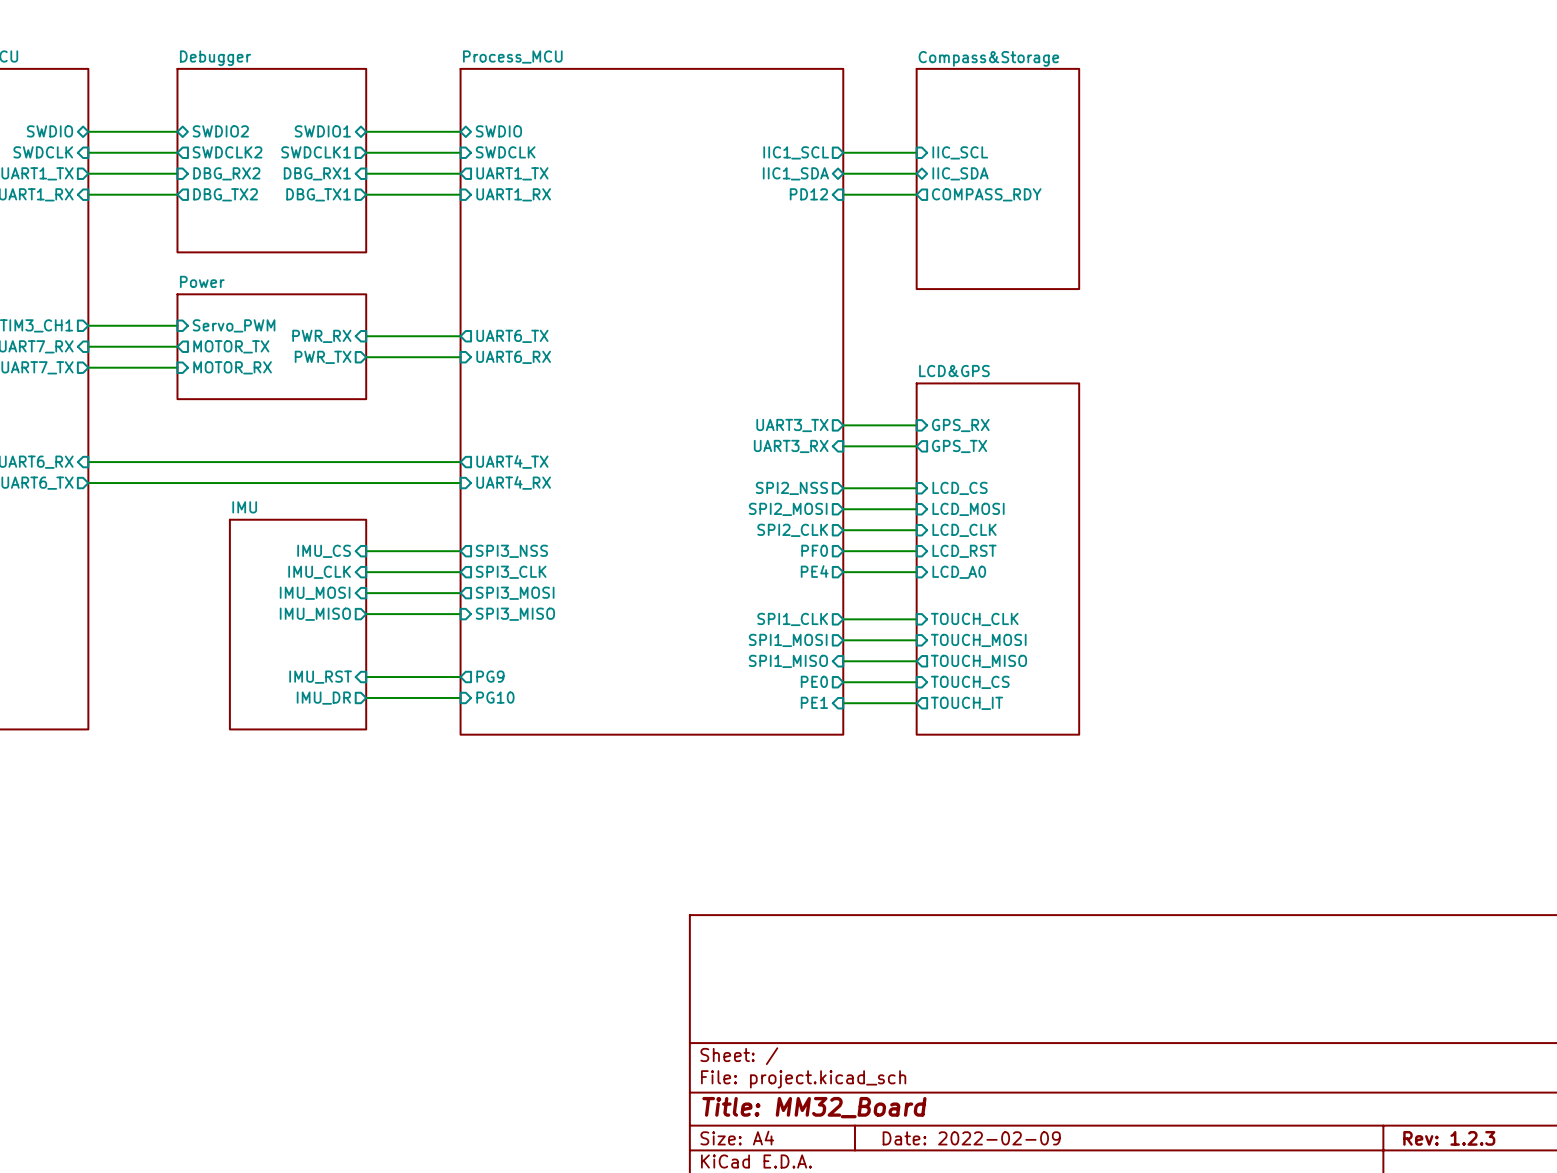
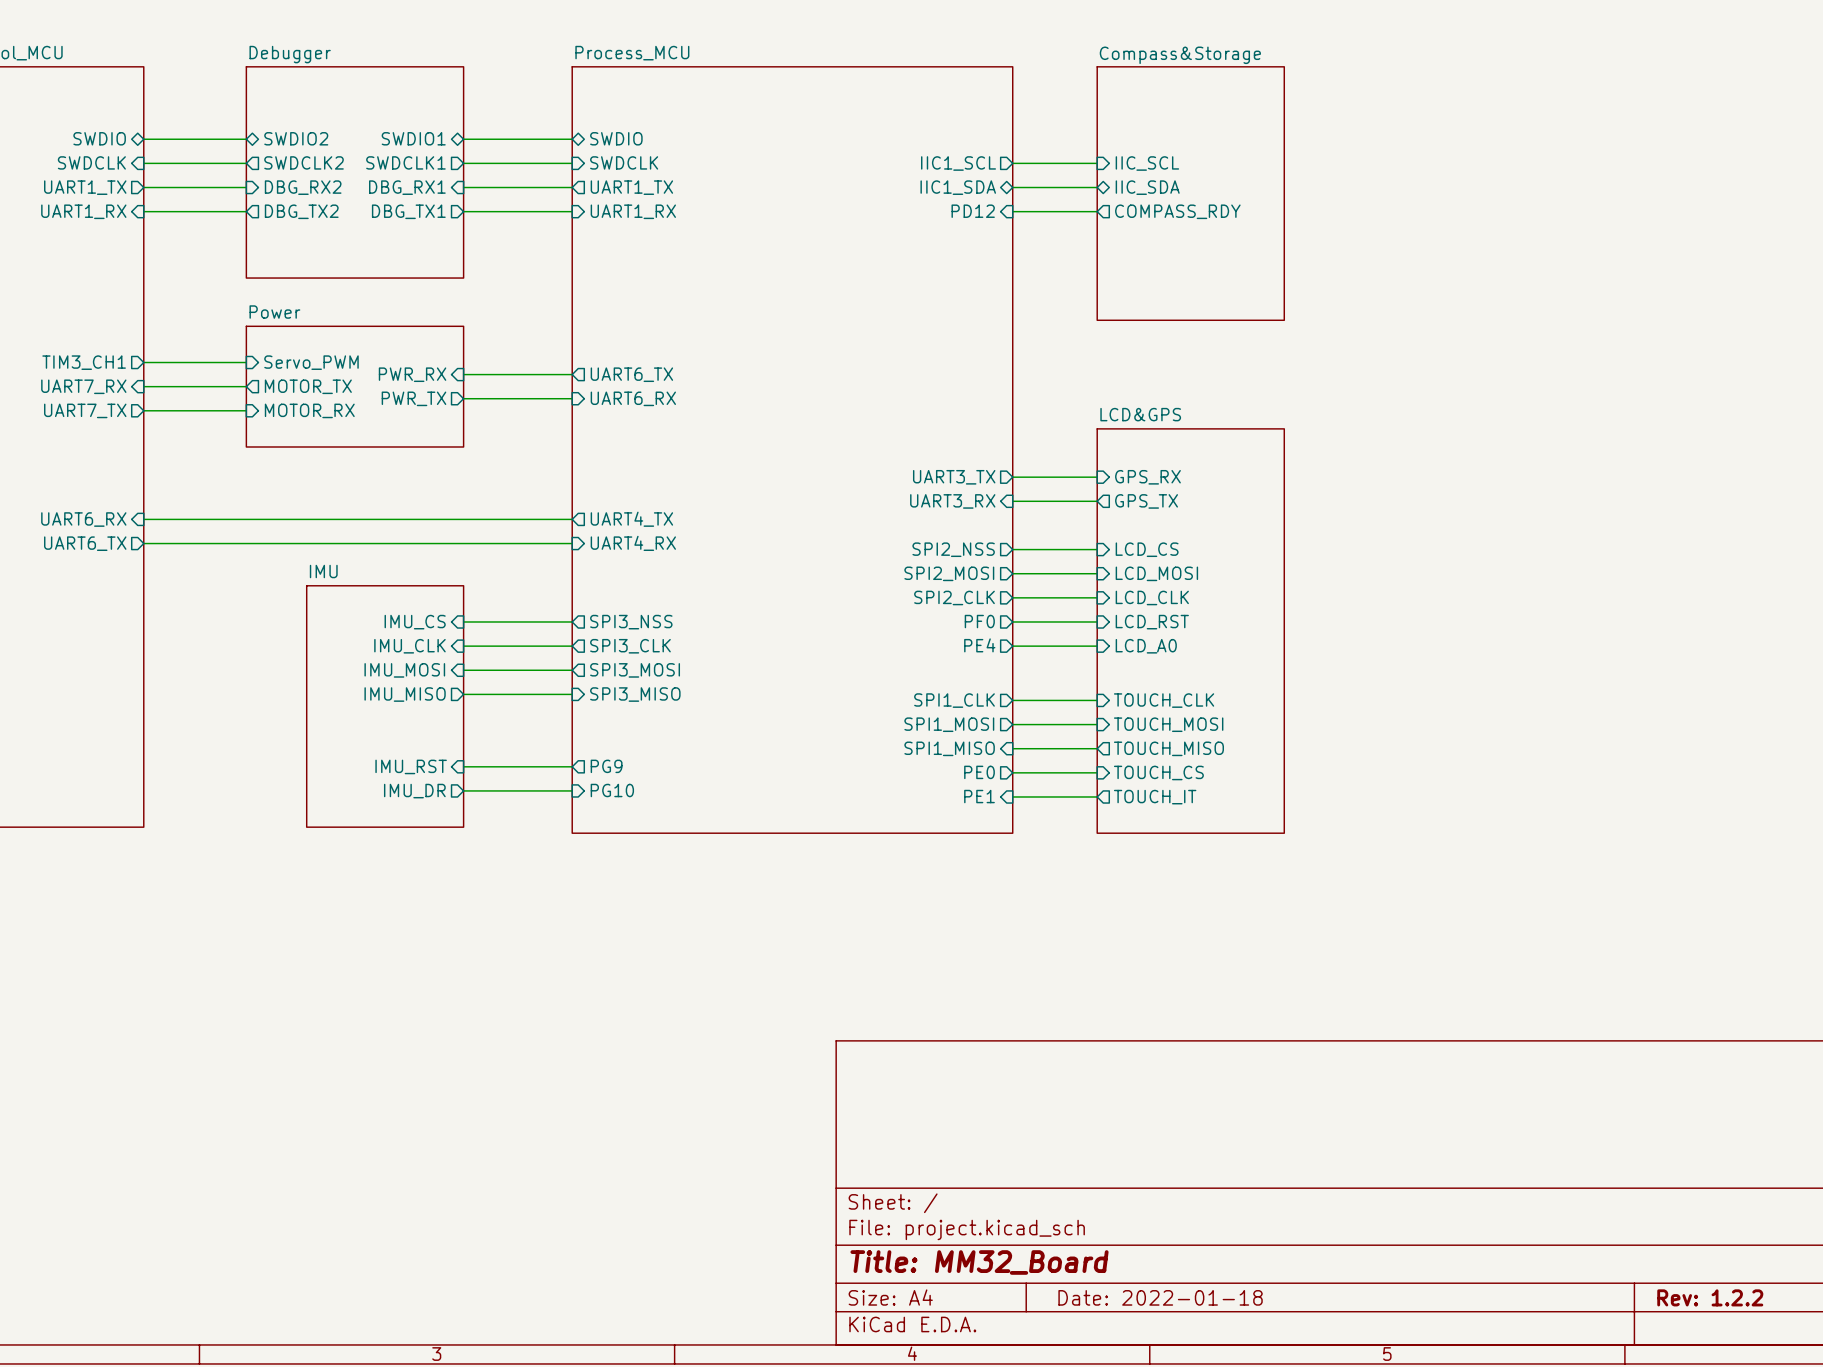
title block: Date: 2022-02-09 (971, 1138) -> Date: 2022-01-18 (1160, 1297)
title block: Rev: 1.2.3 (1449, 1138) -> Rev: 1.2.2 (1710, 1297)

